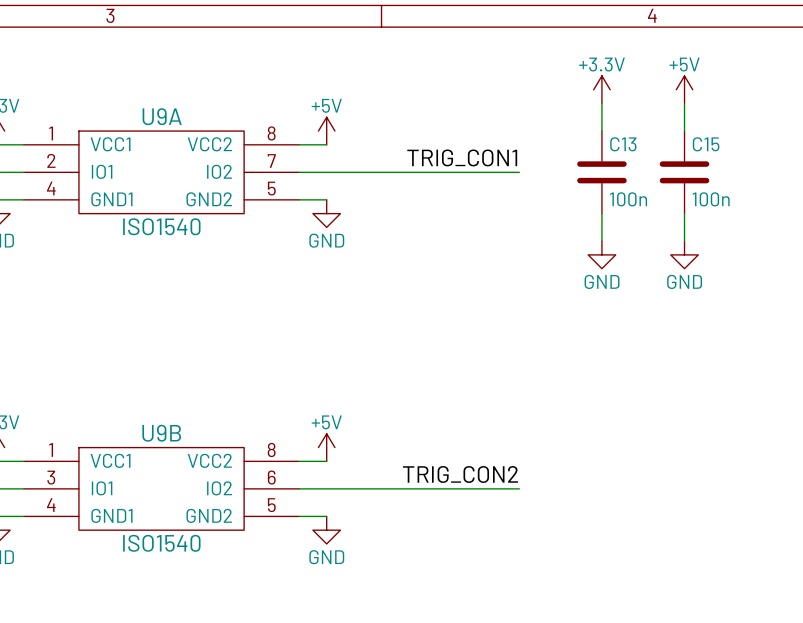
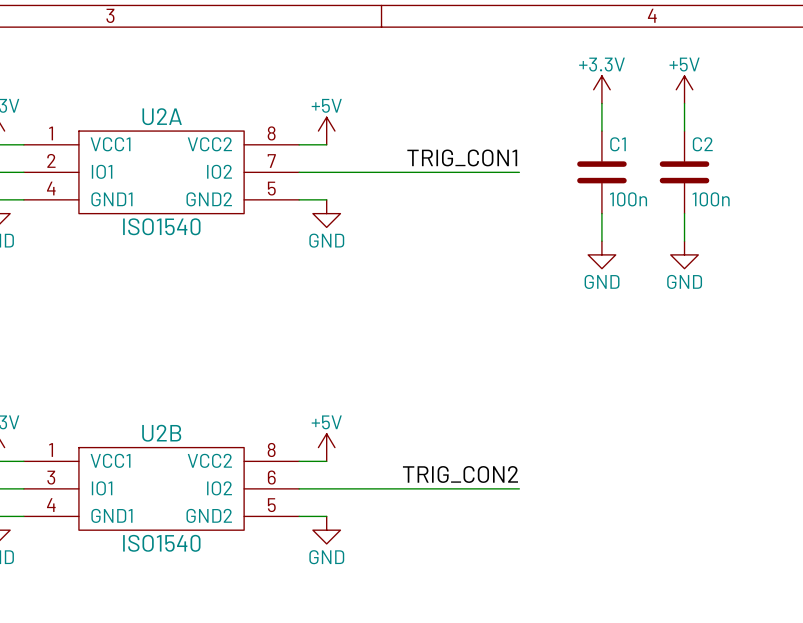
U9A name: U9A (162, 116) -> U2A (162, 116)
C13 name: C13 (623, 144) -> C1 (618, 144)
C15 name: C15 (706, 144) -> C2 (702, 144)
U9B name: U9B (161, 433) -> U2B (161, 433)

